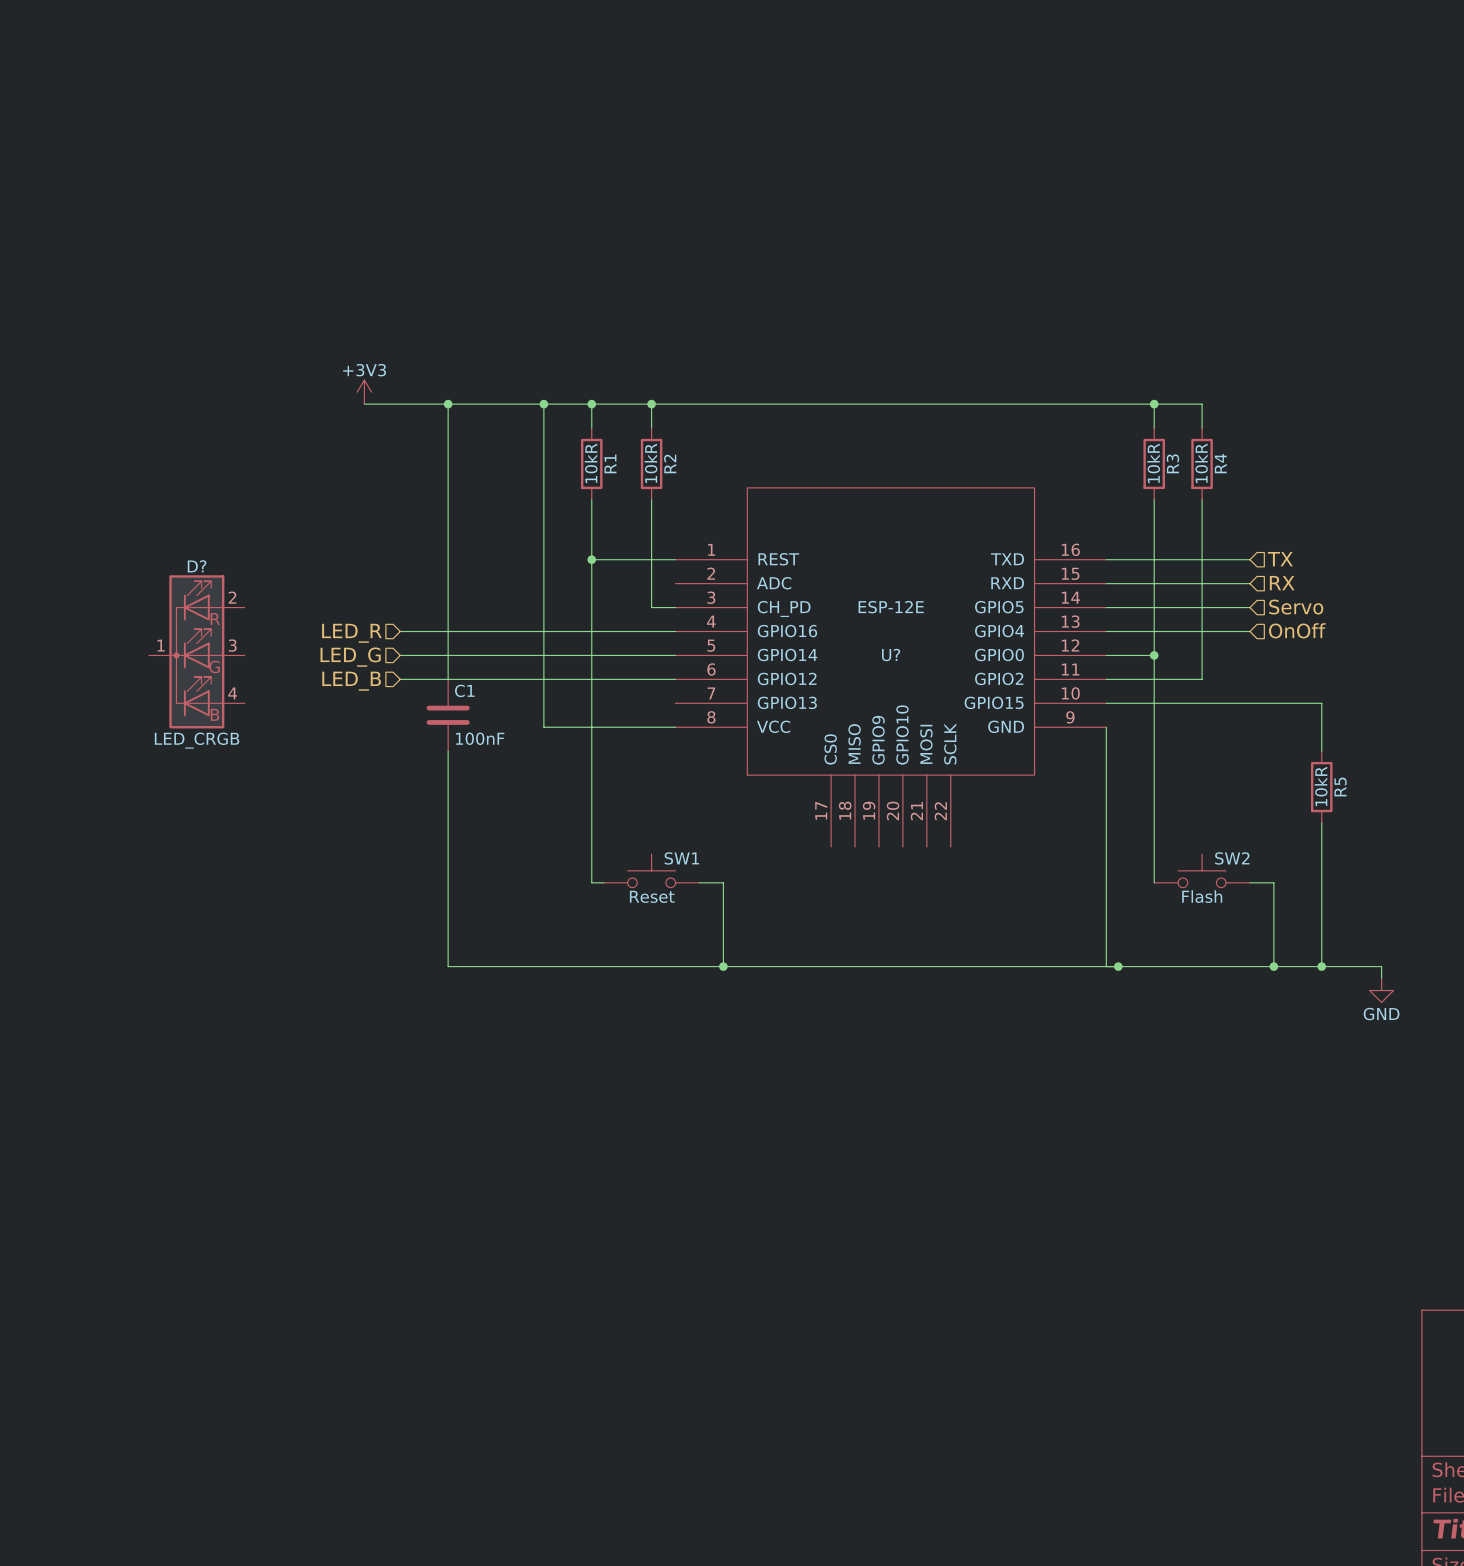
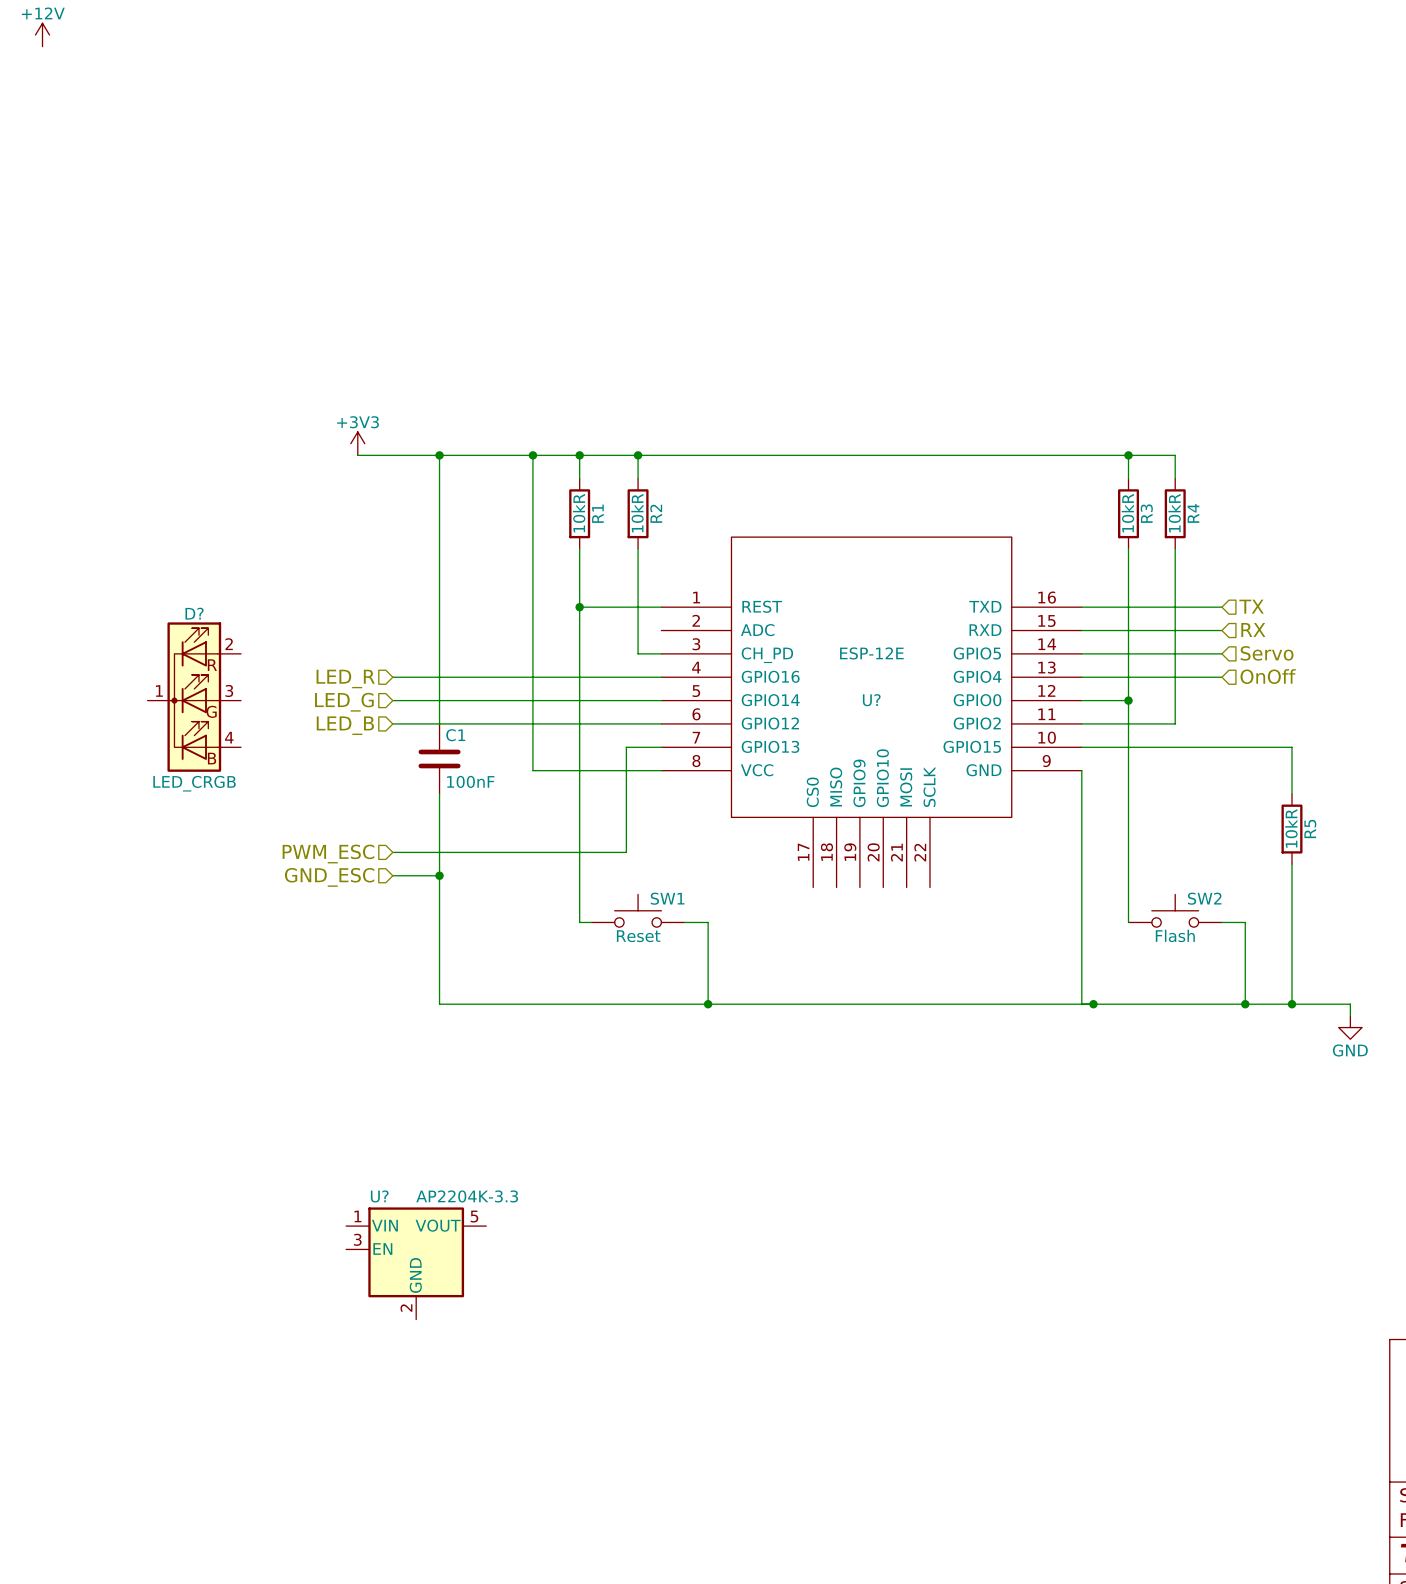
wire: none -> (661, 747) (626, 747) (626, 852) (392, 852)
hierarchical label: none -> PWM_ESC (328, 854)
wire: none -> (392, 875) (439, 875)
junction: none -> (439, 875)
hierarchical label: none -> GND_ESC (329, 877)
U?: none -> AP2204K-3.3 (416, 1263)

